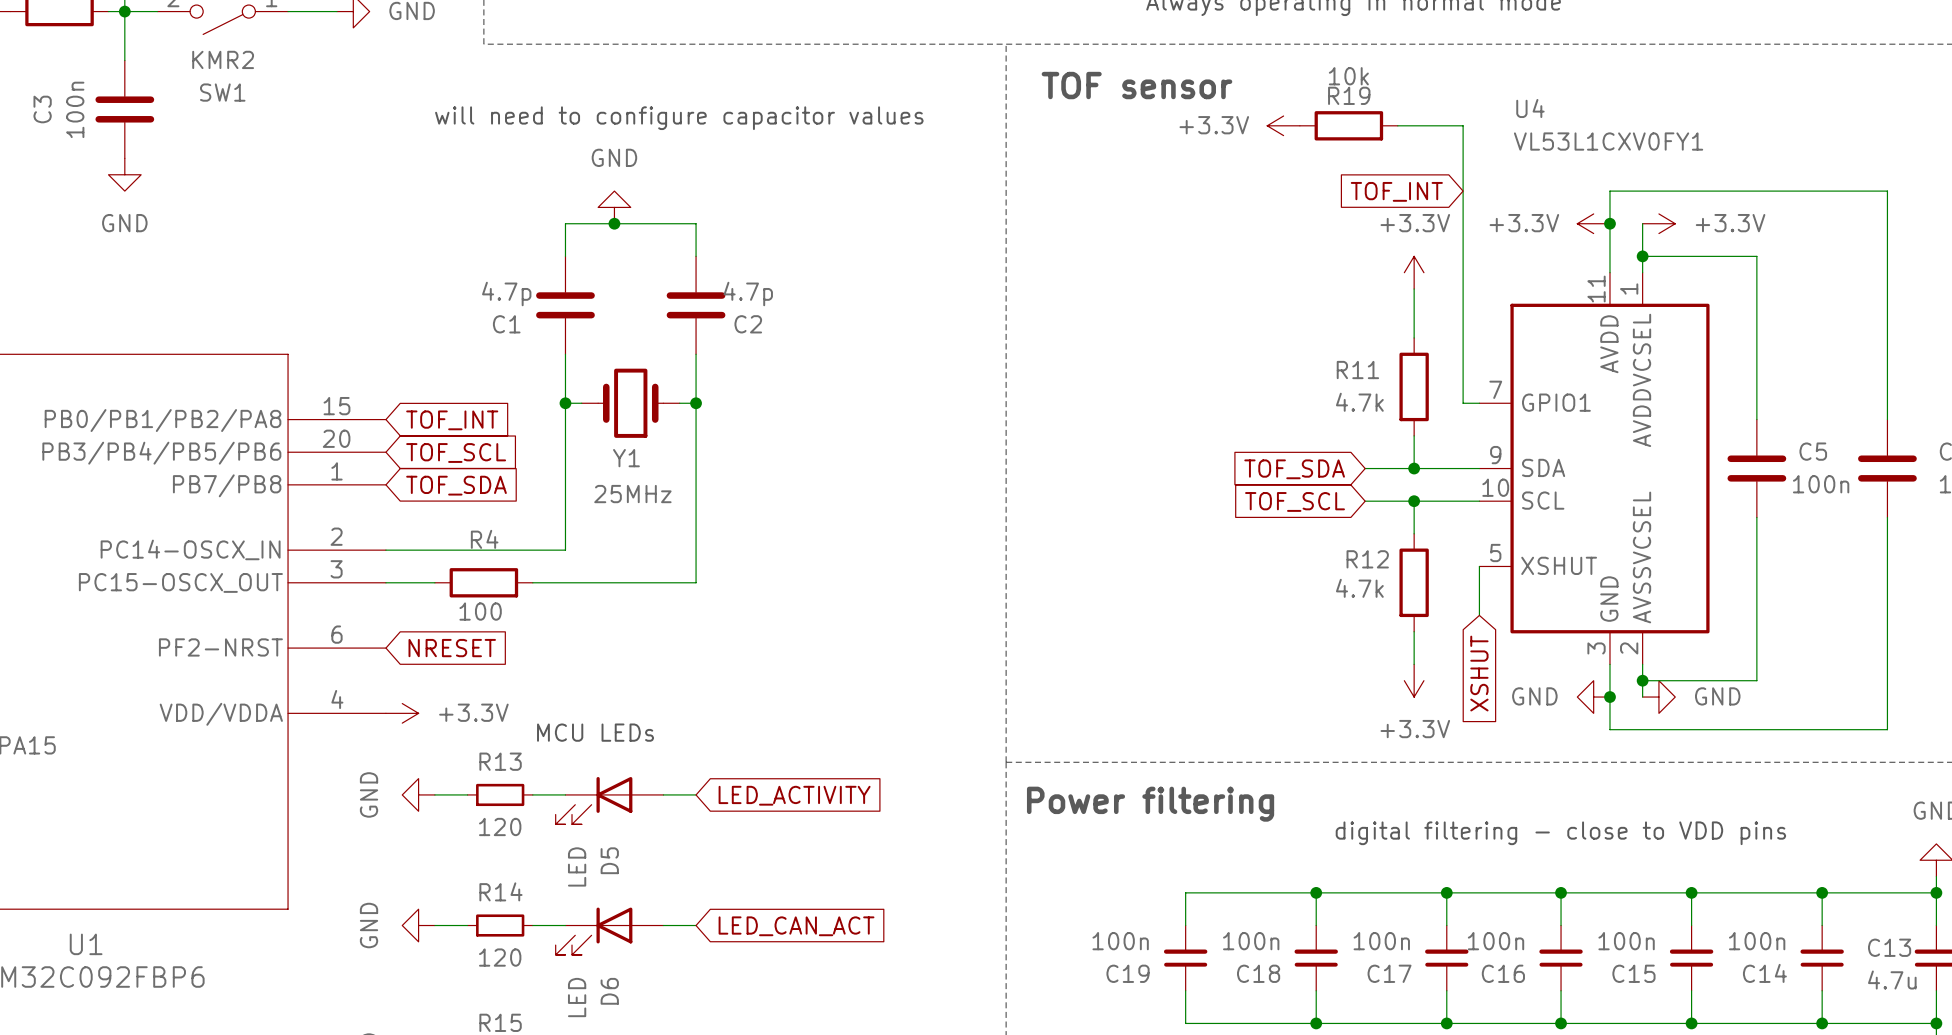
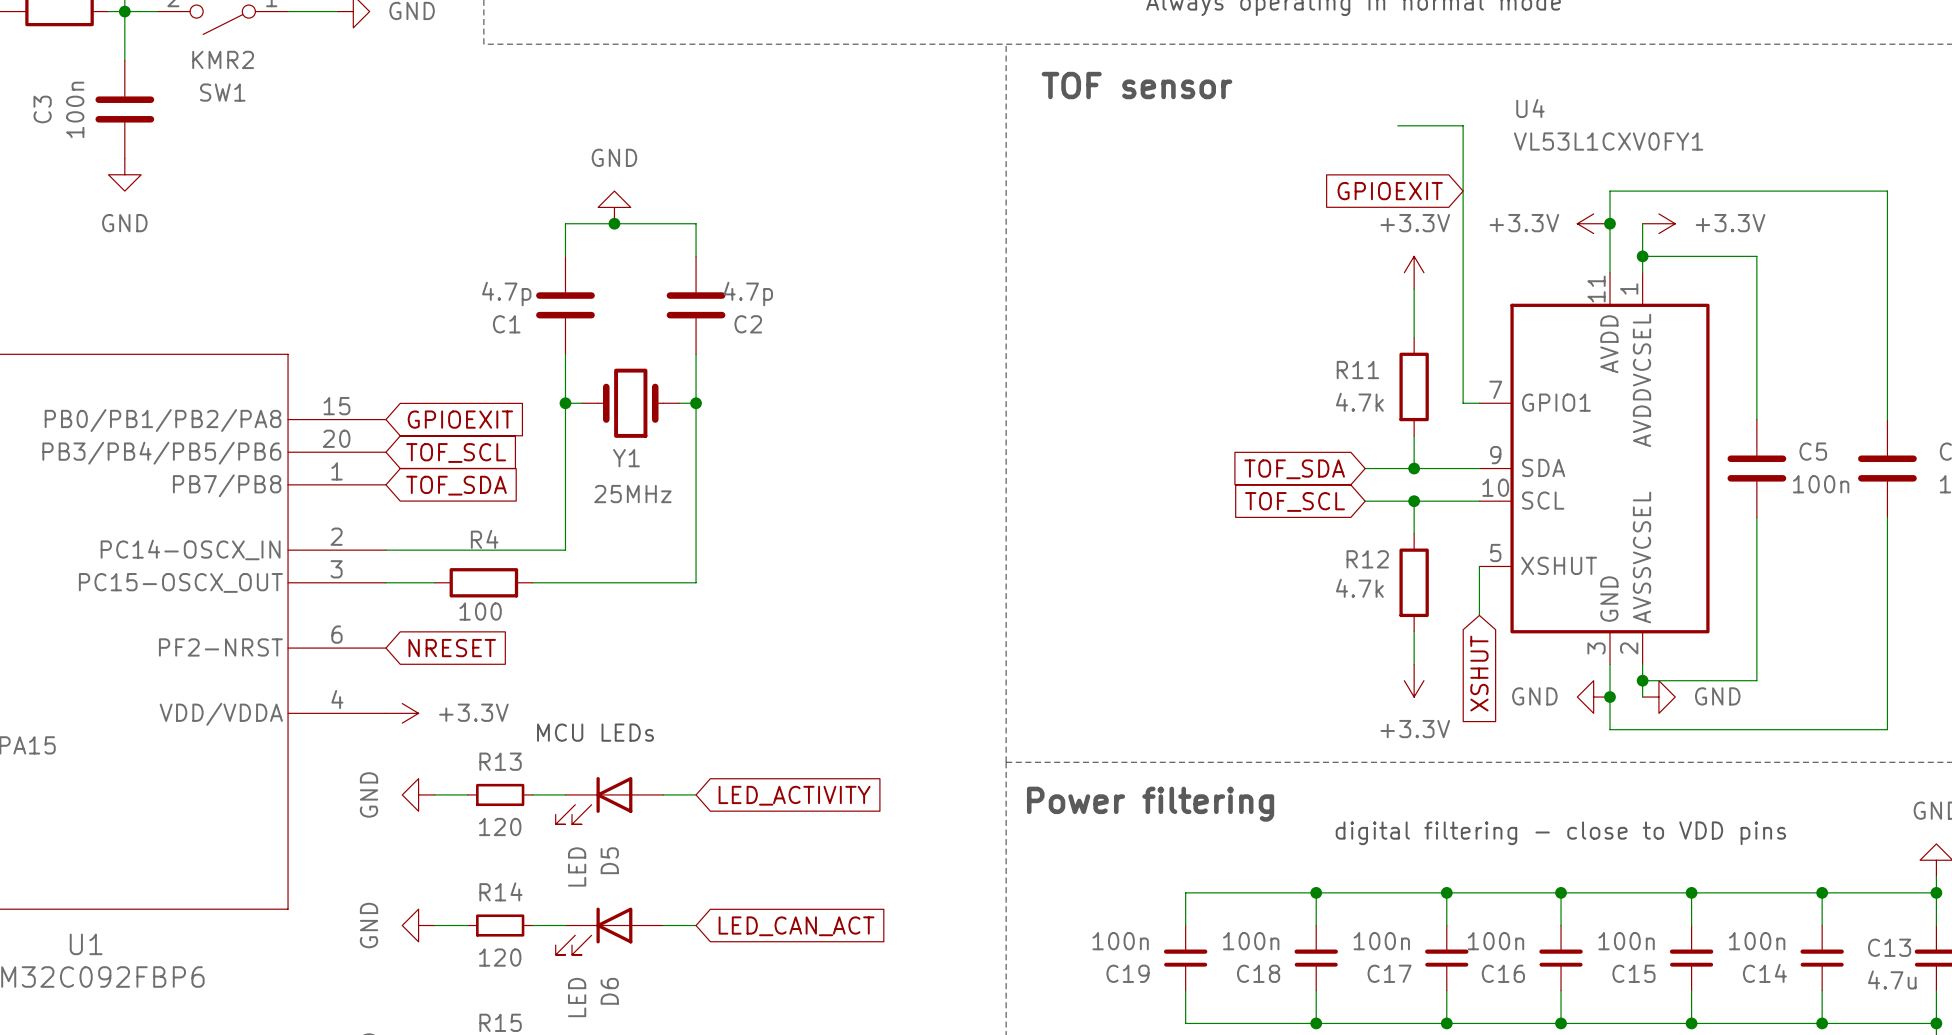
text: will need to configure capacitor values (679, 118) -> none
power symbol: +3.3V (1283, 125) -> none
R19: 10k (1348, 125) -> none
global label: TOF_INT (1396, 191) -> GPIOEXIT (1390, 191)
global label: TOF_INT (452, 420) -> GPIOEXIT (460, 419)

